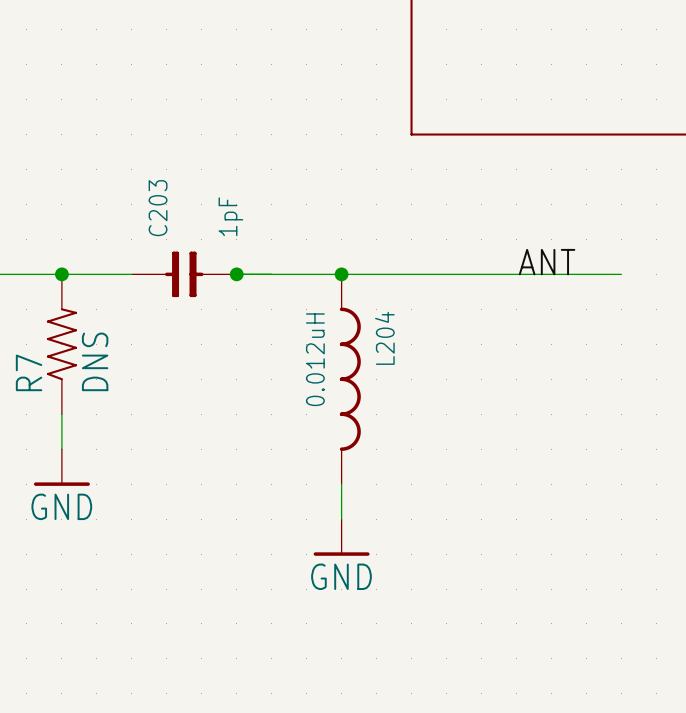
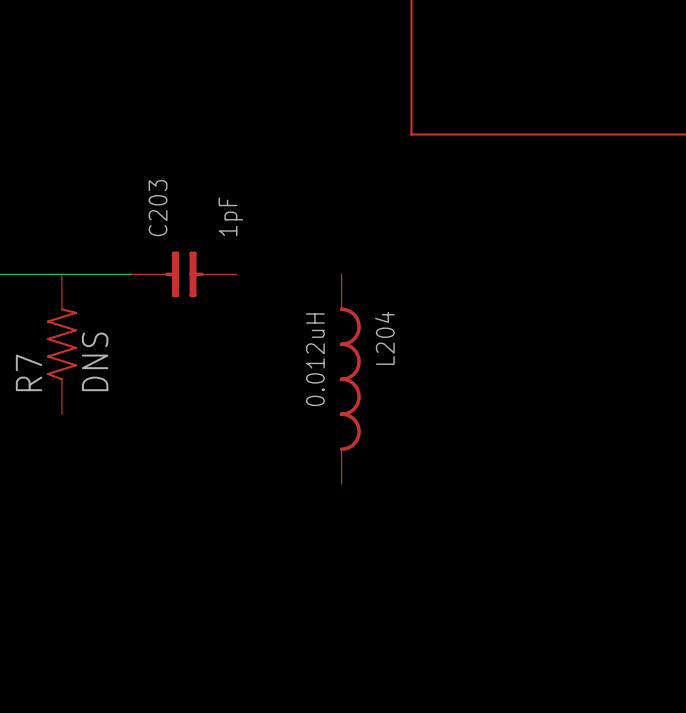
label: ANT (547, 262) -> none
junction: (61, 274) -> none
wire: (236, 274) (621, 274) -> none
junction: (236, 274) -> none
junction: (341, 274) -> none
wire: (61, 414) (61, 449) -> none
power symbol: GND (61, 467) -> none
wire: (341, 484) (341, 519) -> none
power symbol: GND (341, 537) -> none

